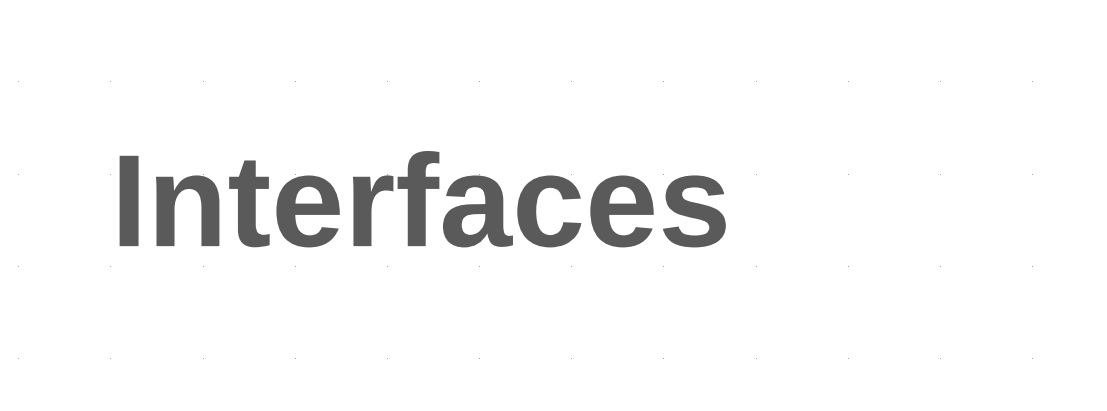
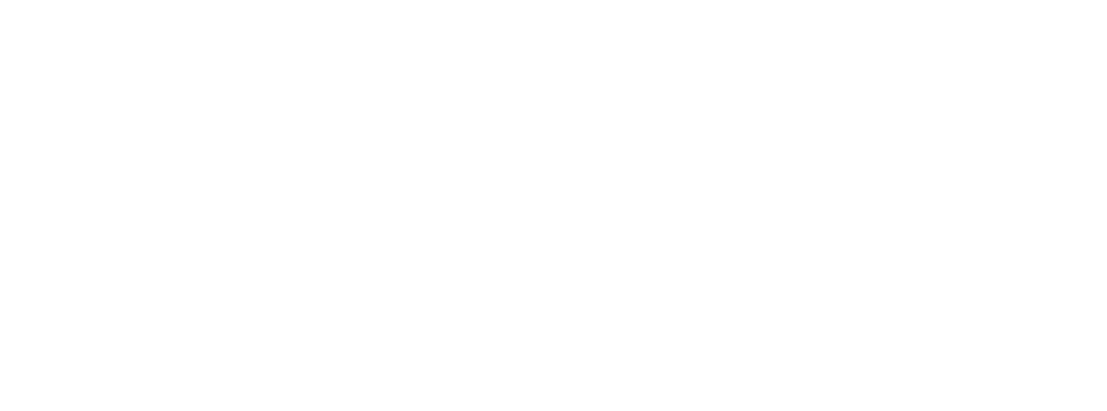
text: Interfaces (422, 199) -> none

